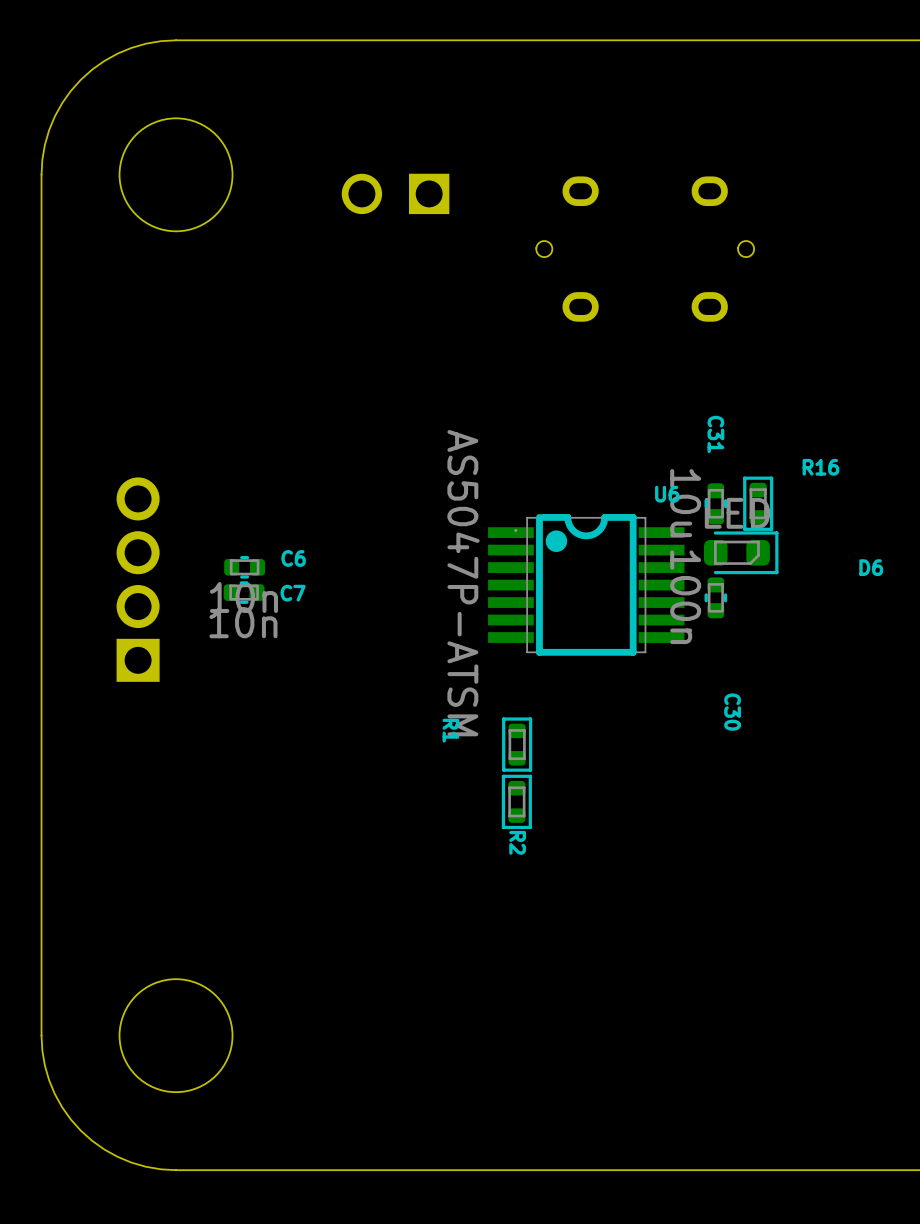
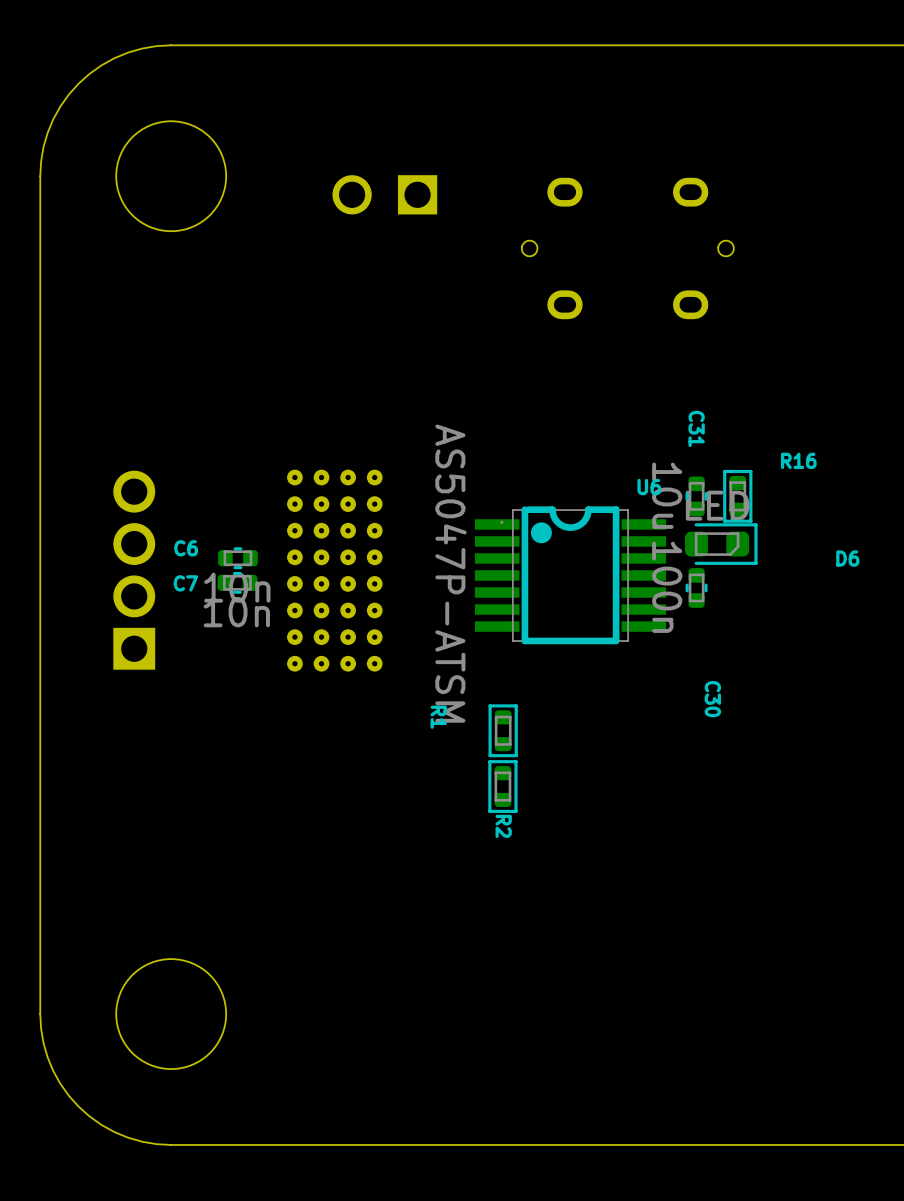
C6 name position: C6 (293, 558) -> C6 (186, 548)
part: none -> (334, 570)
C7 name position: C7 (293, 593) -> C7 (185, 583)

